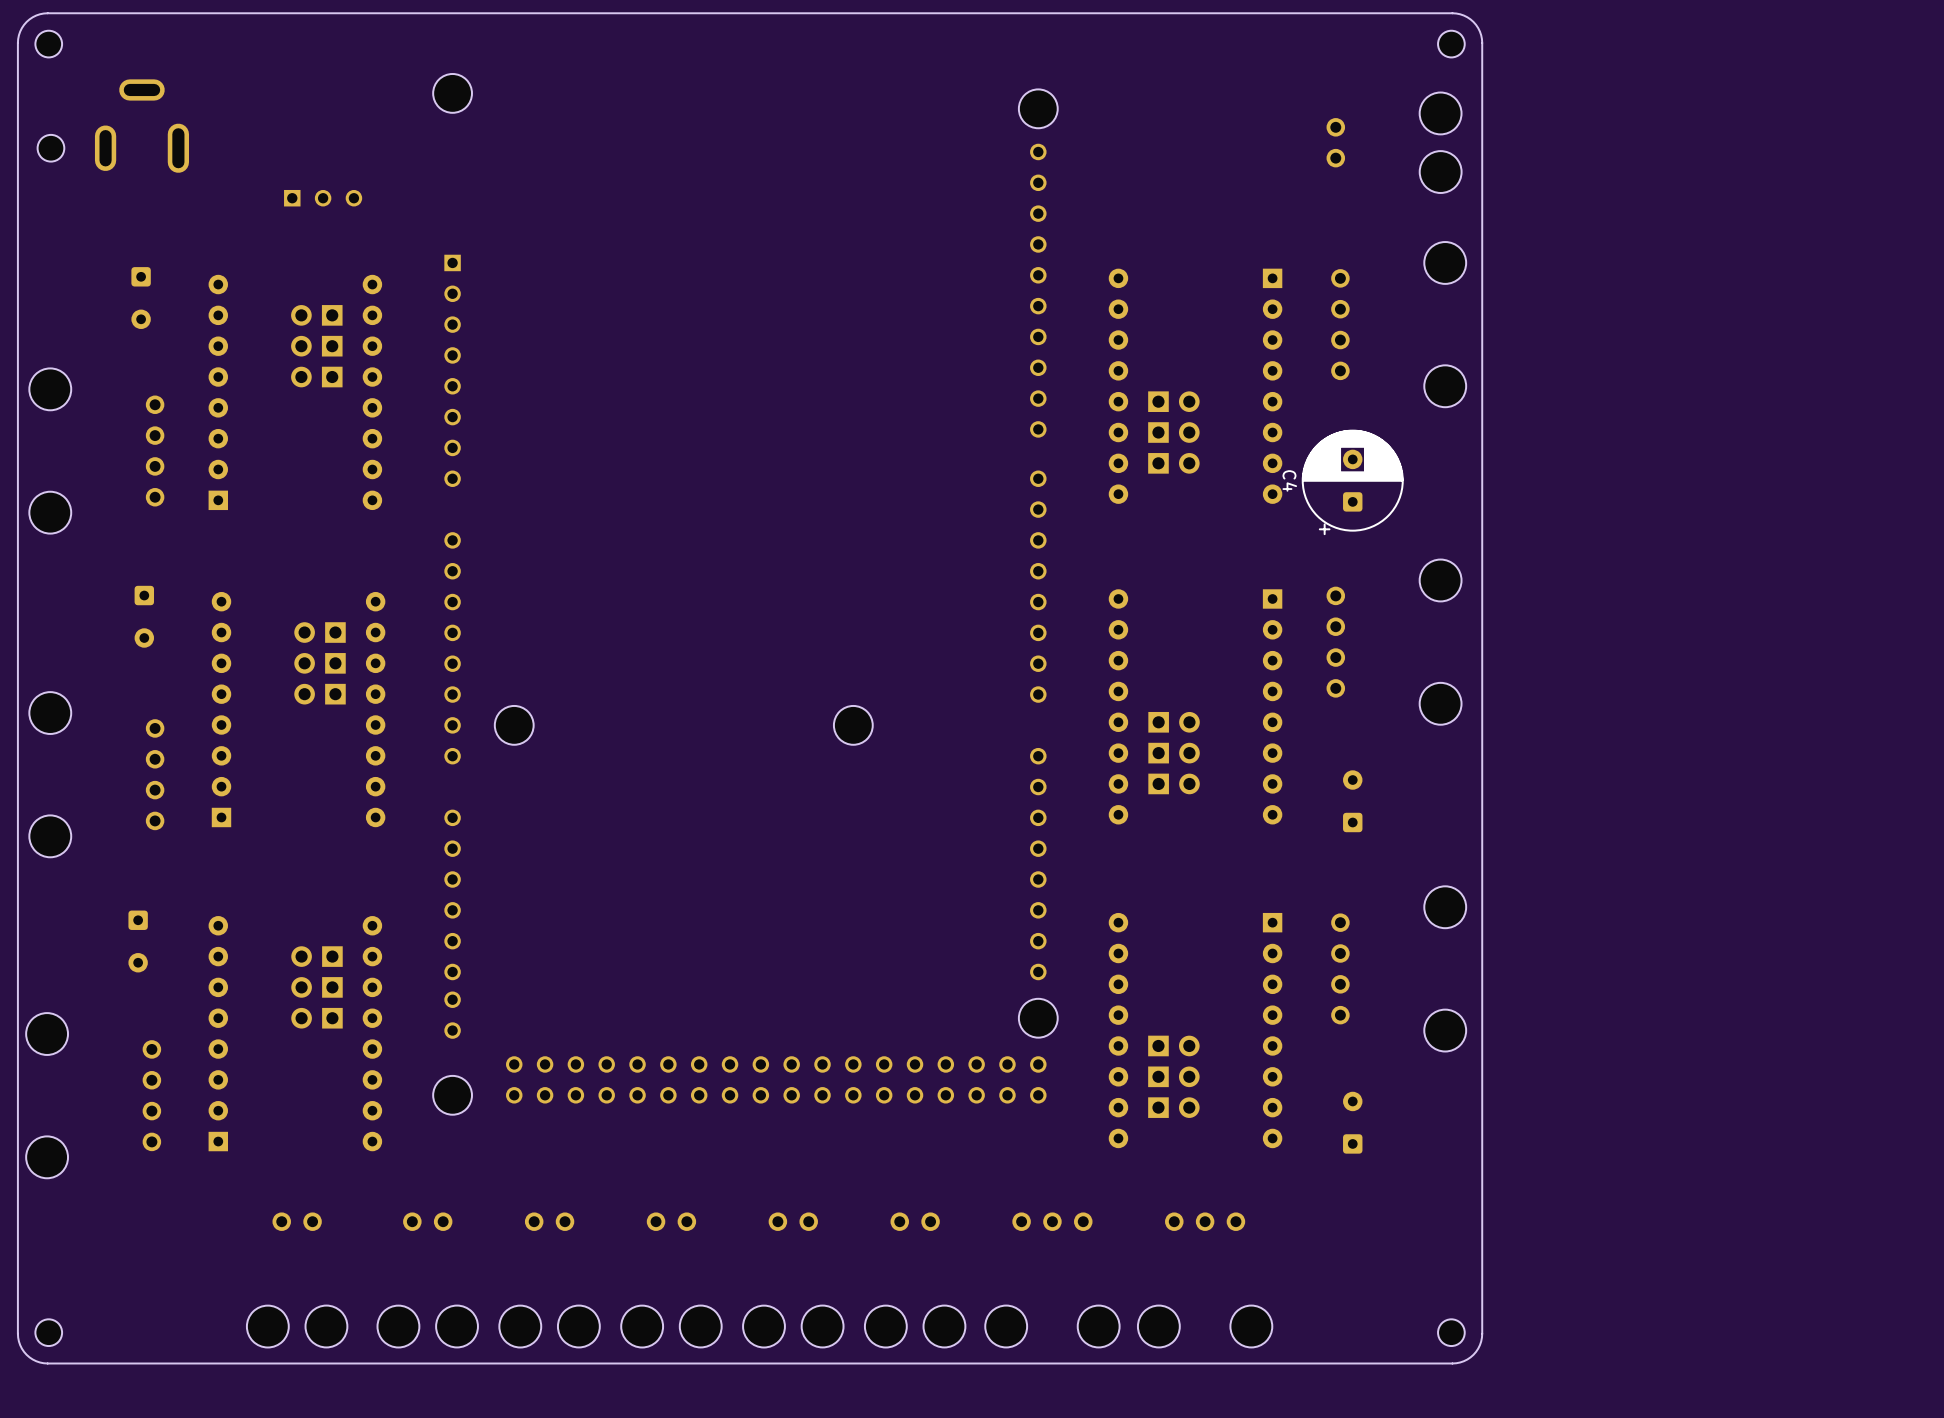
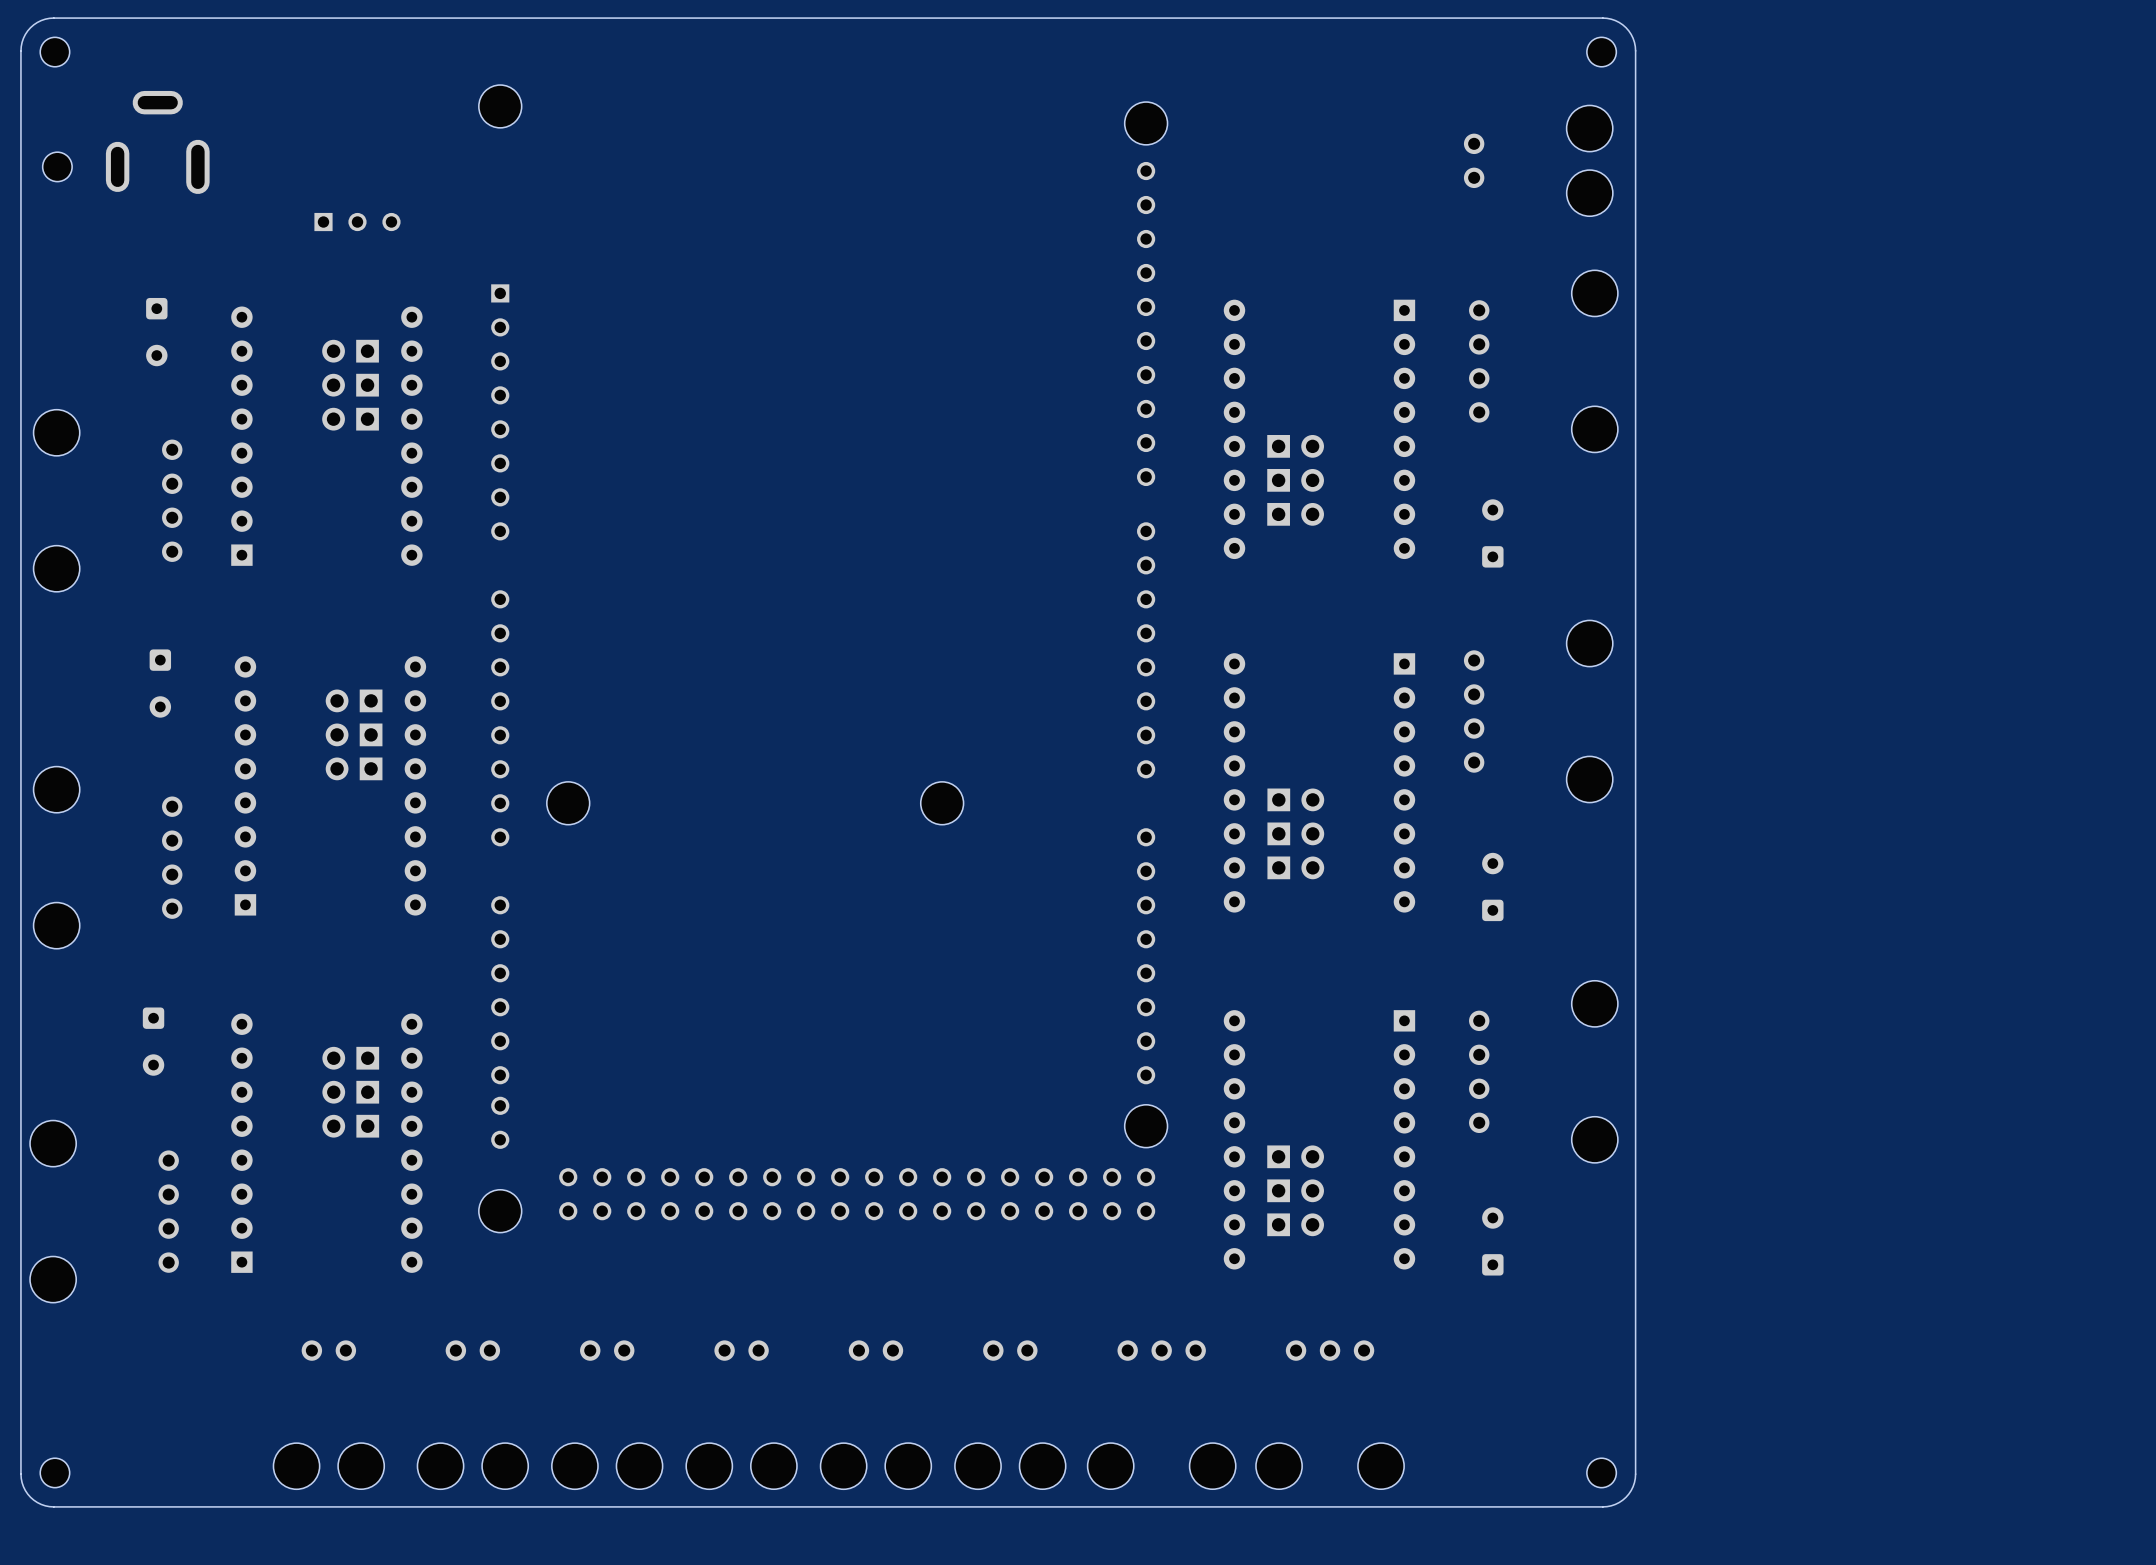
C4 side: bottom (1352, 482) -> top (1492, 533)

